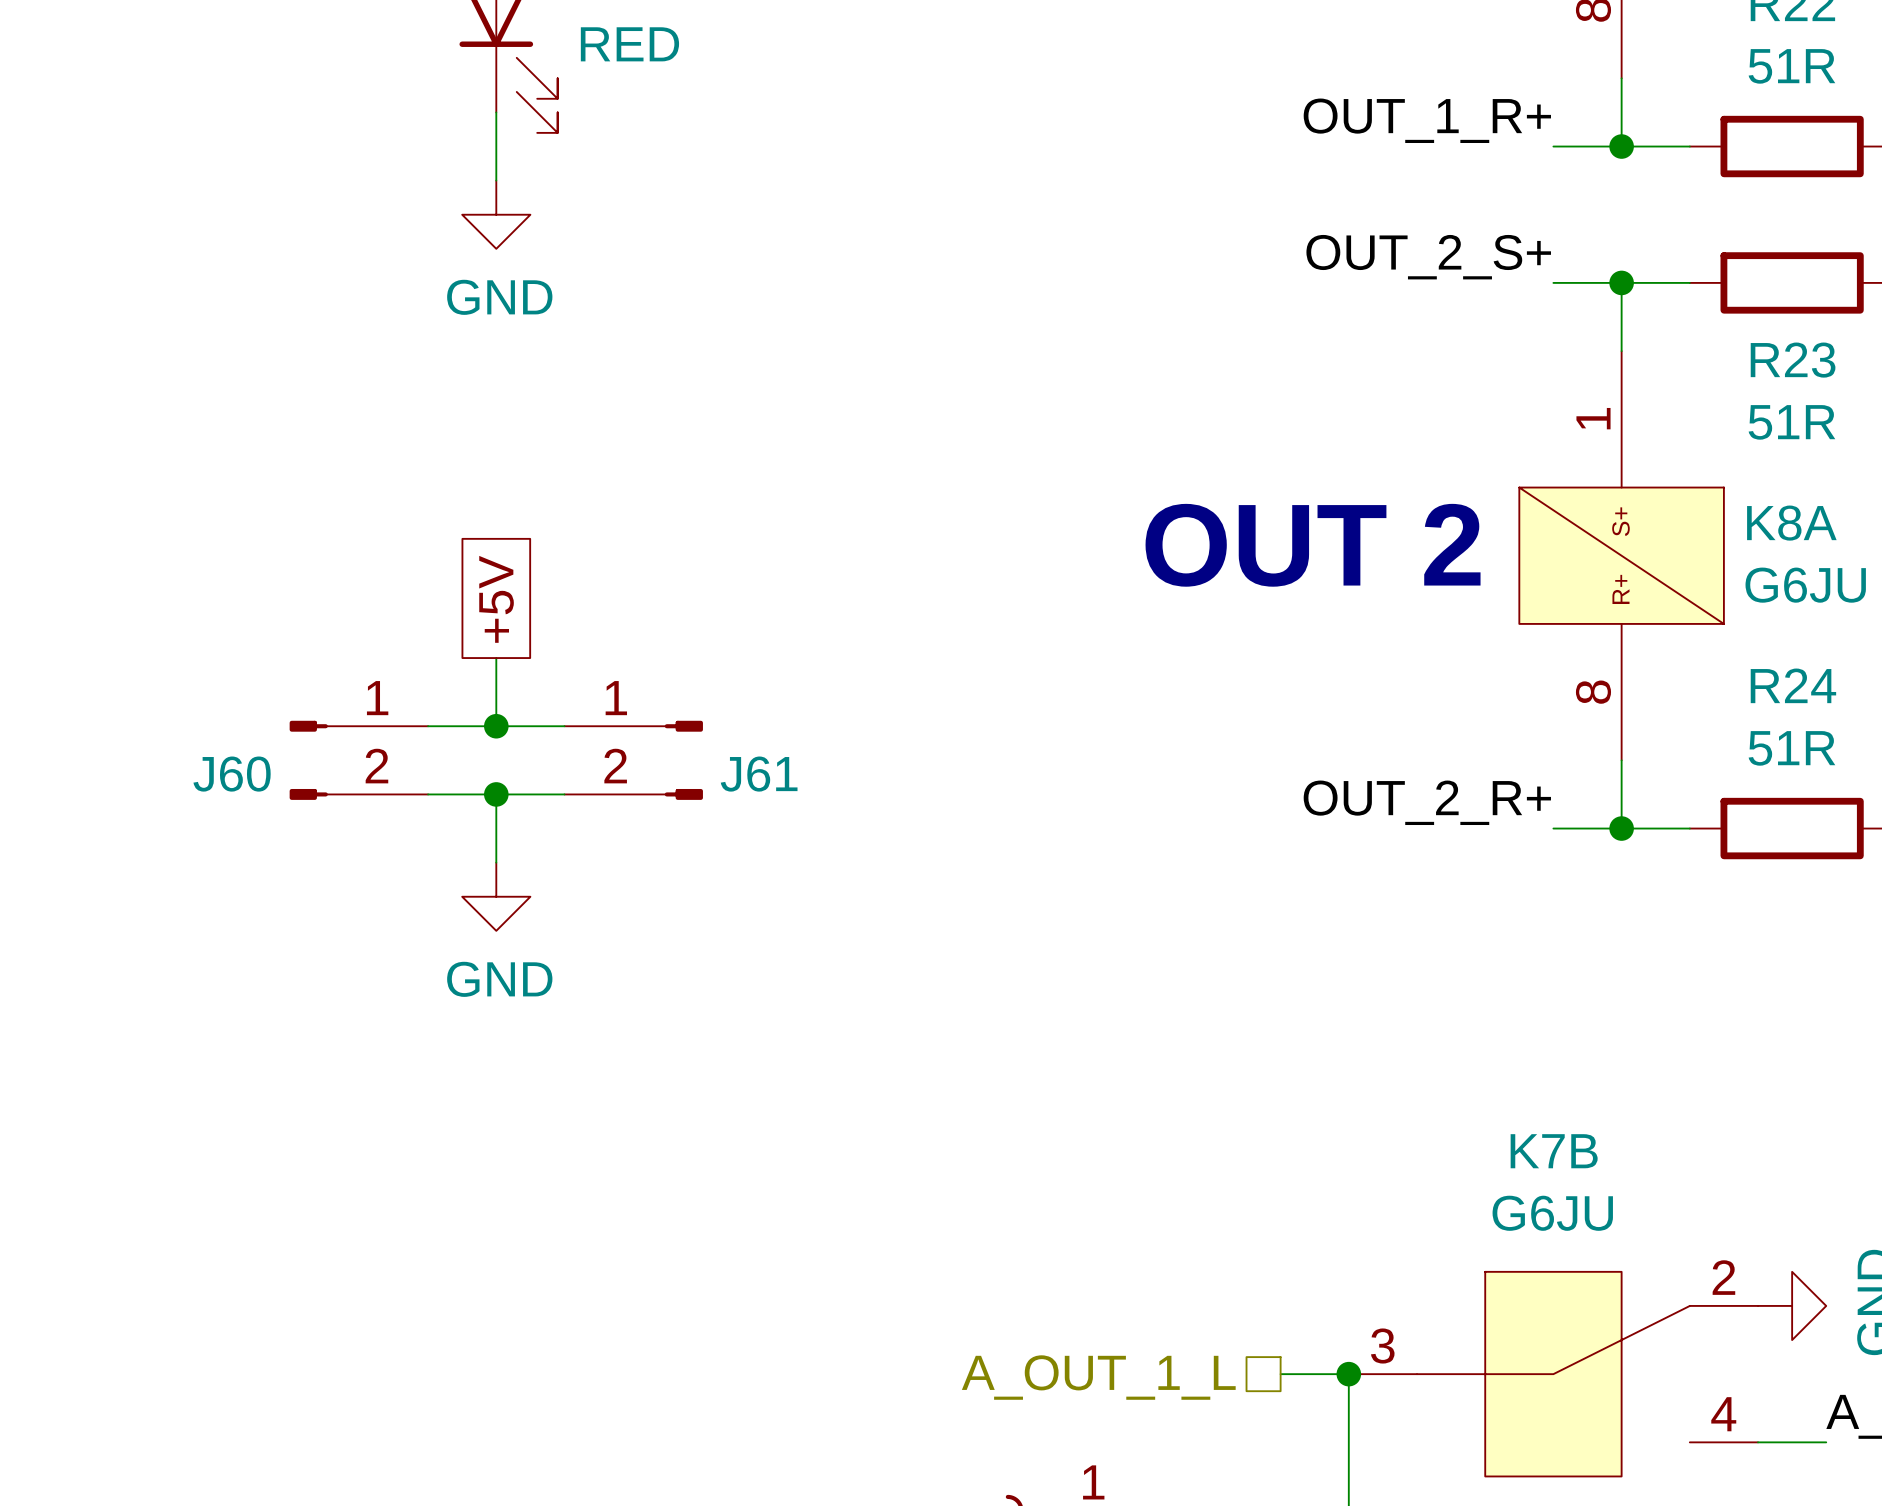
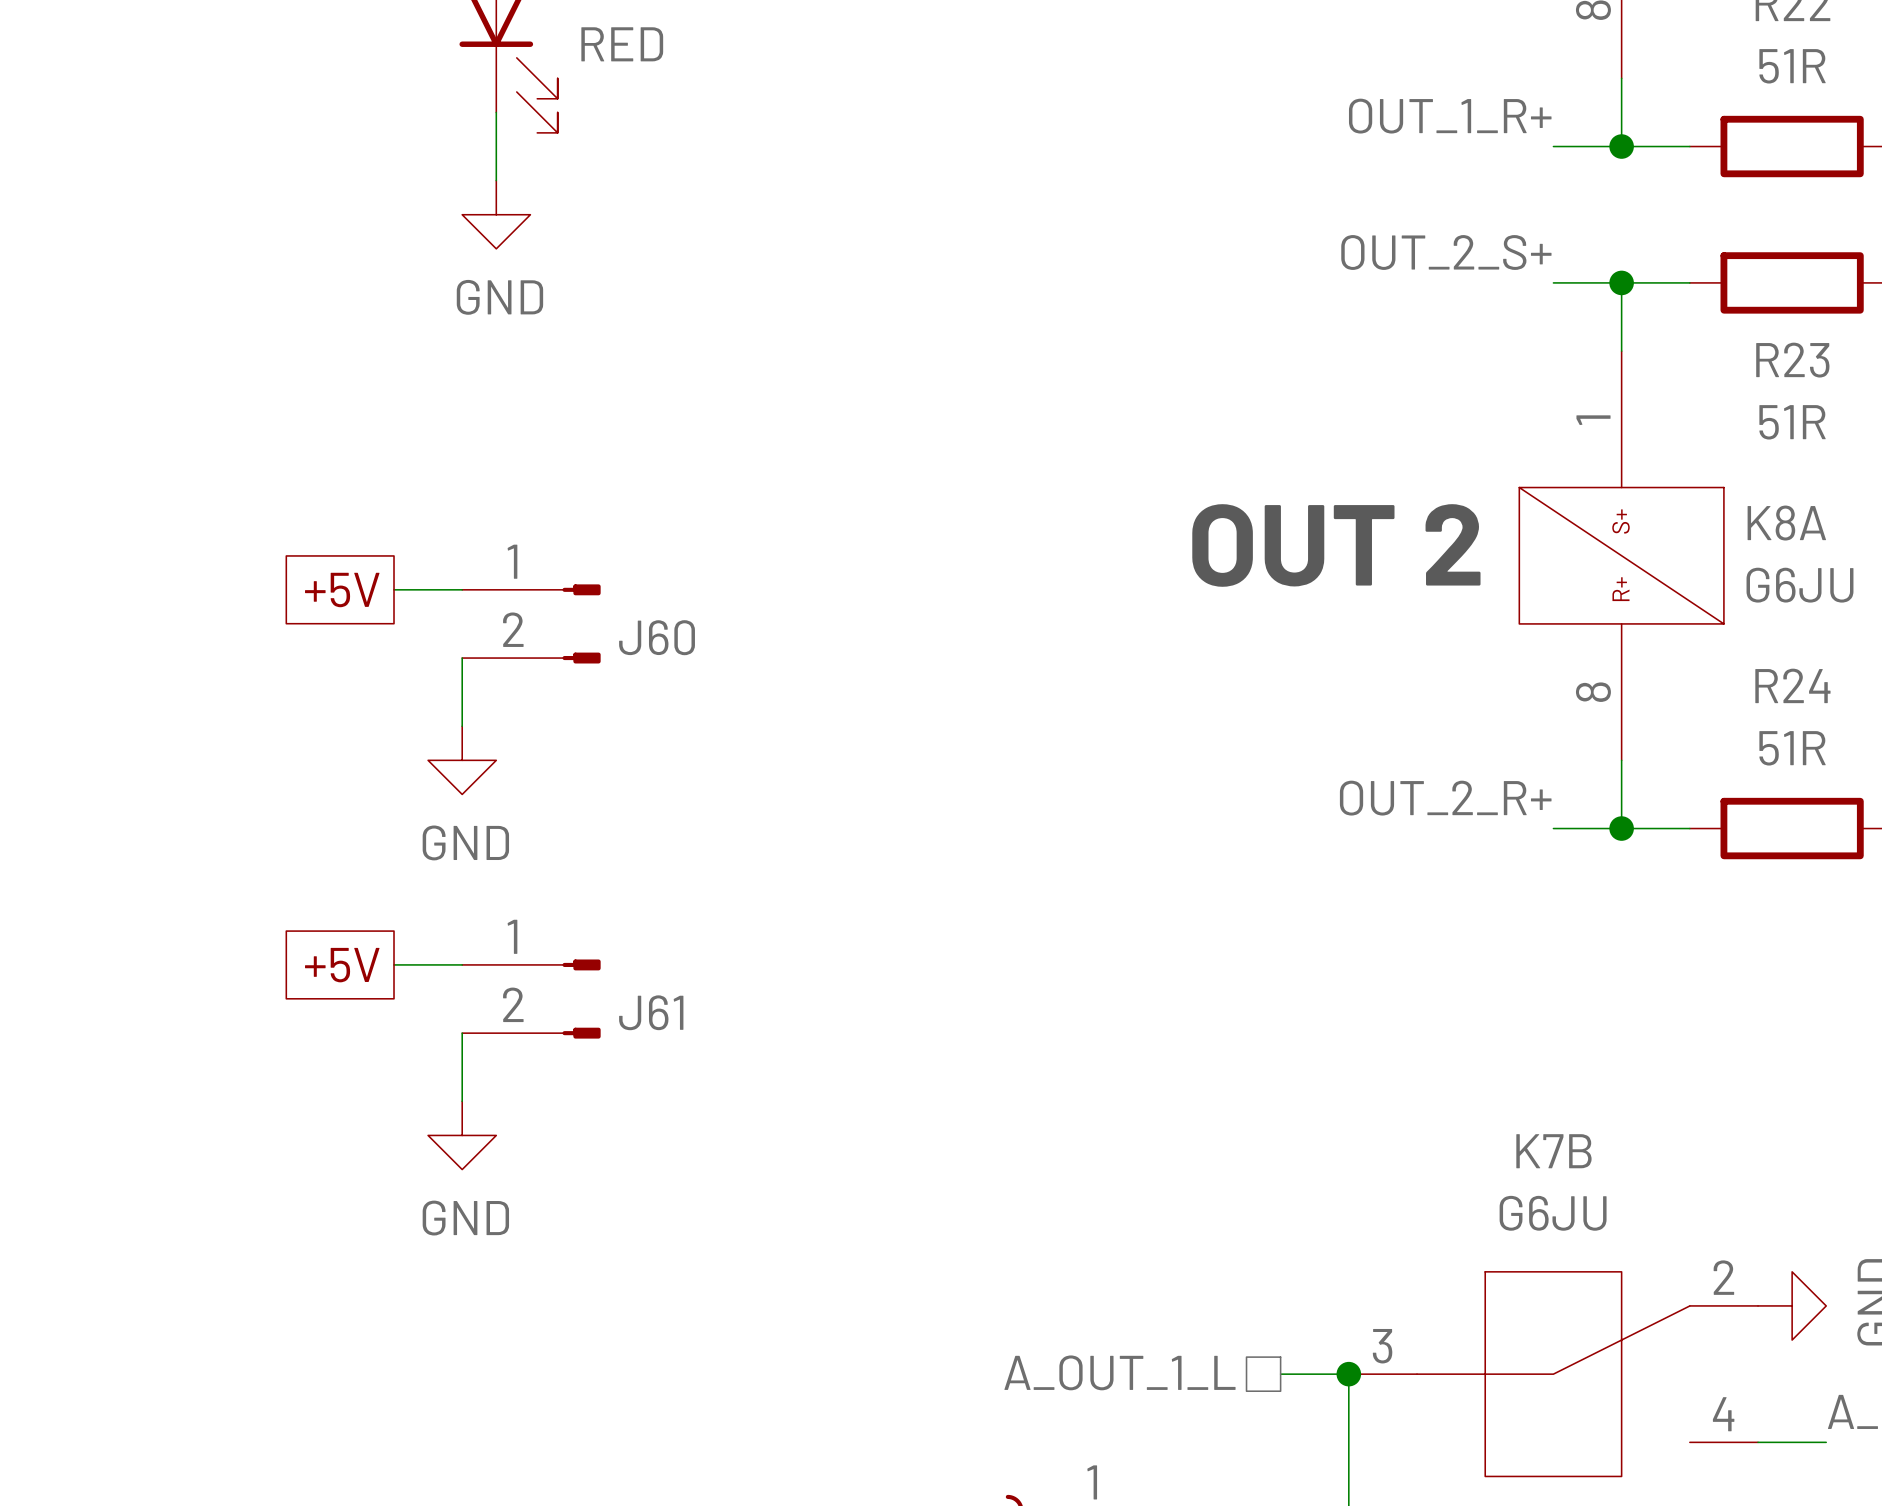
wire: none -> (394, 589) (462, 589)
global label rotation: 0° (496, 599) -> 90° counterclockwise (342, 590)
global label position: +5V (496, 599) -> +5V (342, 590)
wire: (496, 658) (496, 726) -> (462, 658) (462, 726)
wire: (428, 726) (564, 726) -> none
junction: (496, 726) -> none
J60 flip: as is (308, 760) -> left-right (581, 623)
J60 position: (358, 760) -> (531, 623)
power symbol: none -> GND (462, 760)
J61 position: (633, 760) -> (531, 999)
wire: (428, 794) (564, 794) -> none
wire: (496, 794) (496, 862) -> (462, 1033) (462, 1101)
junction: (496, 794) -> none
power symbol: GND (496, 896) -> none
wire: none -> (394, 964) (462, 964)
global label: none -> +5V (342, 965)
power symbol: none -> GND (462, 1135)

